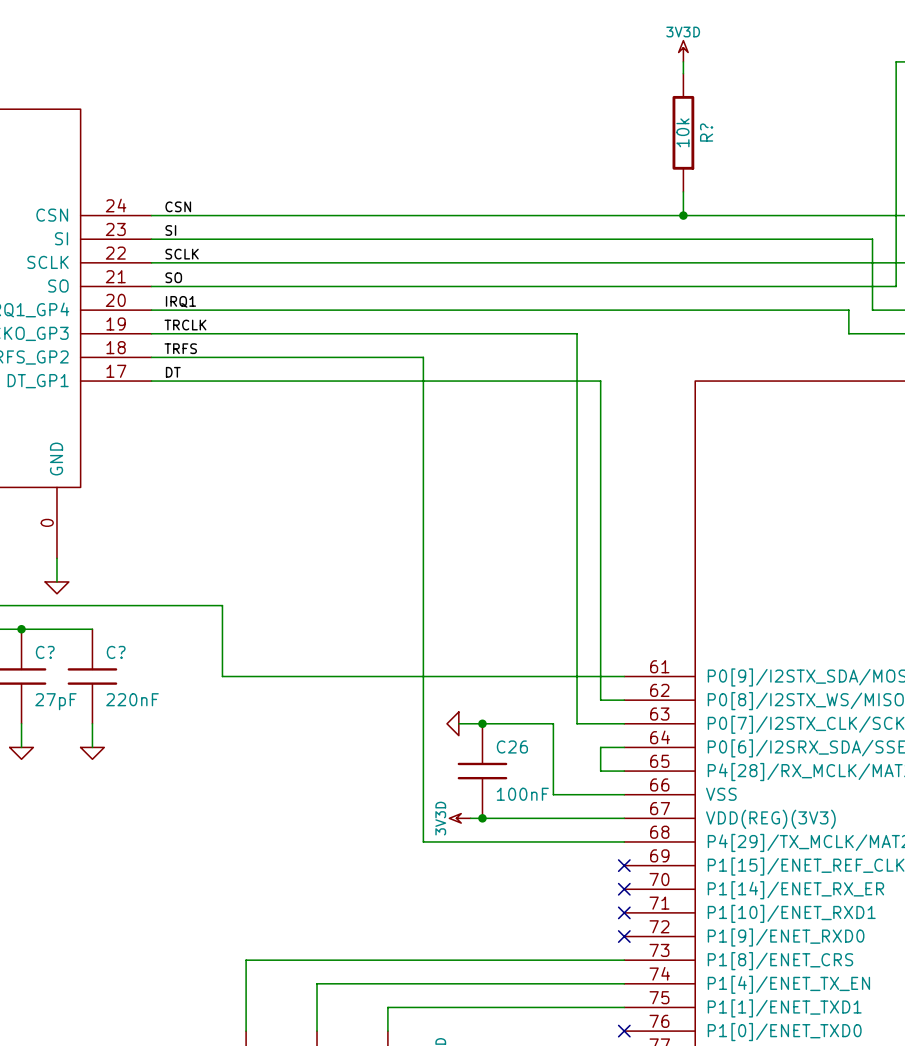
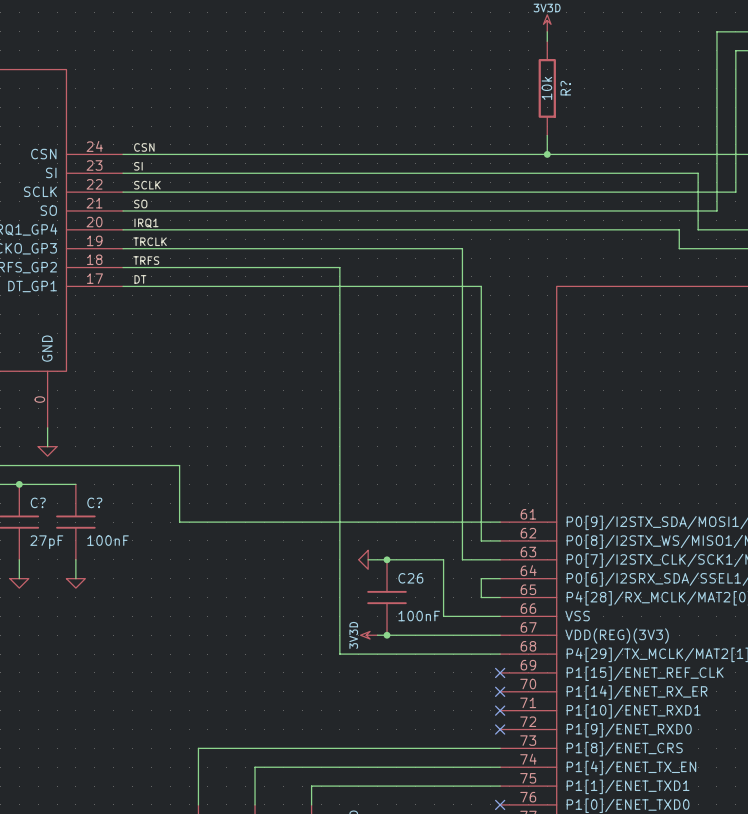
C? value: 220nF (132, 699) -> 100nF (108, 540)

